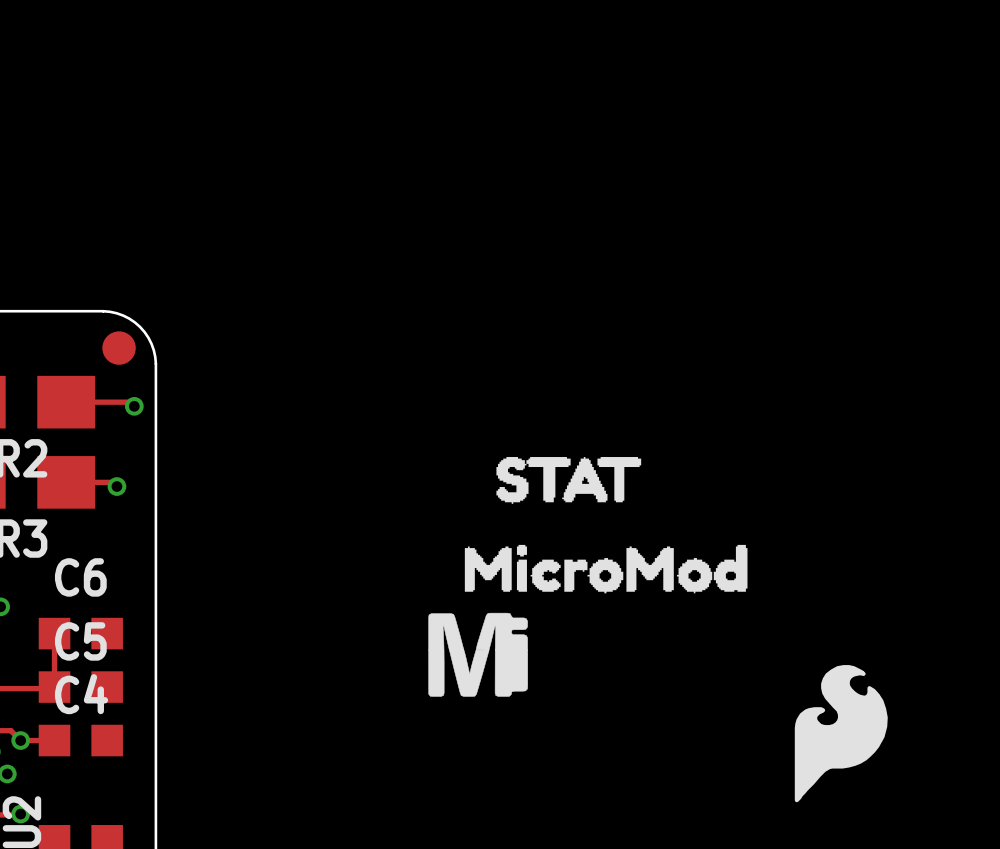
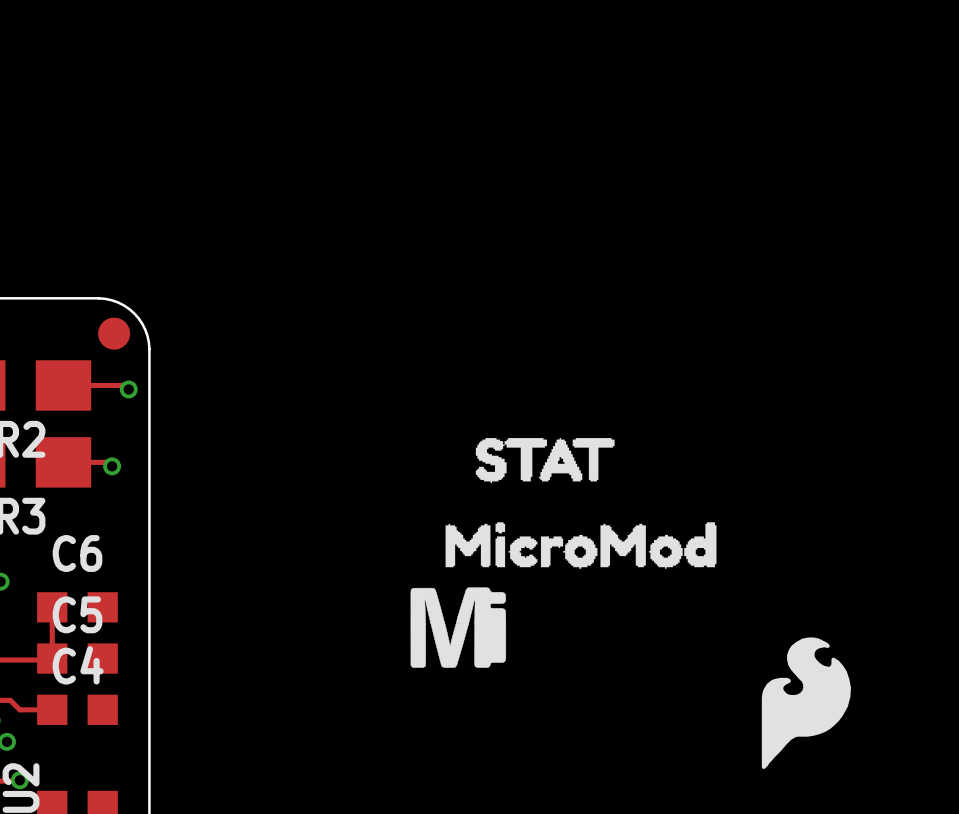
via: (20, 740) -> none

